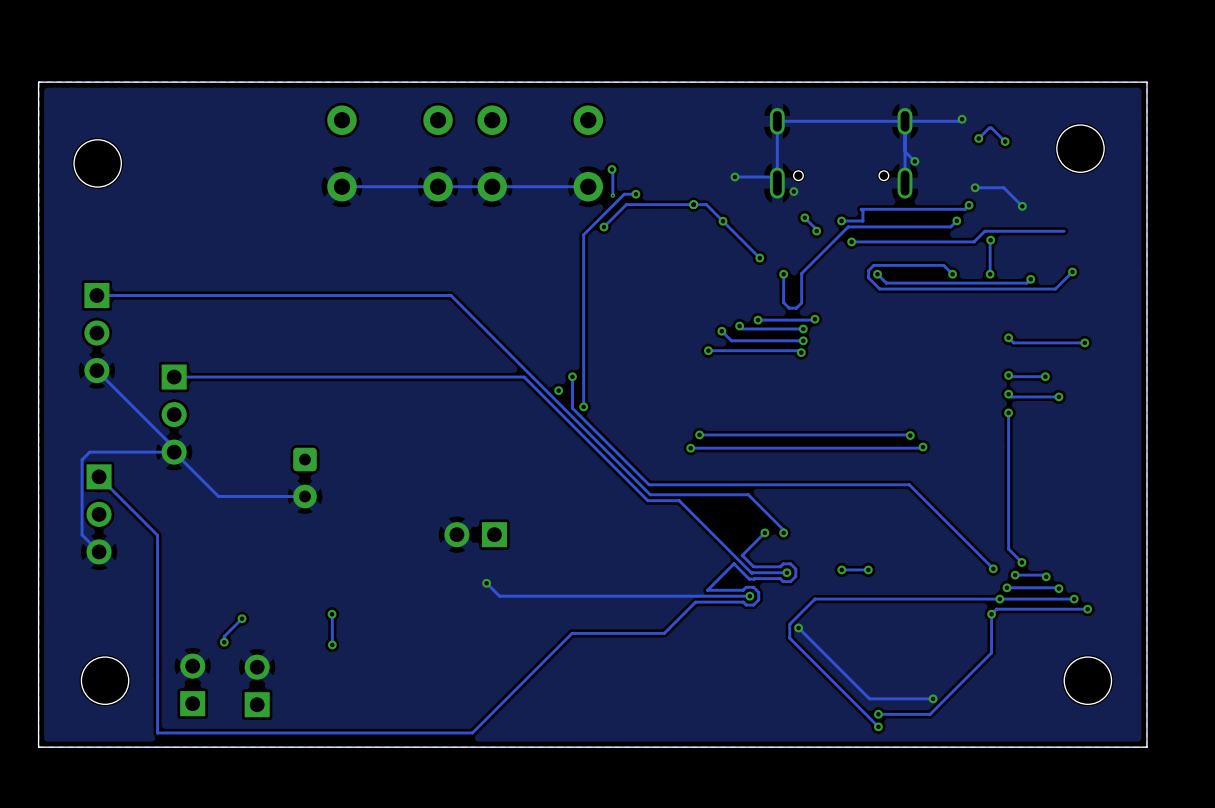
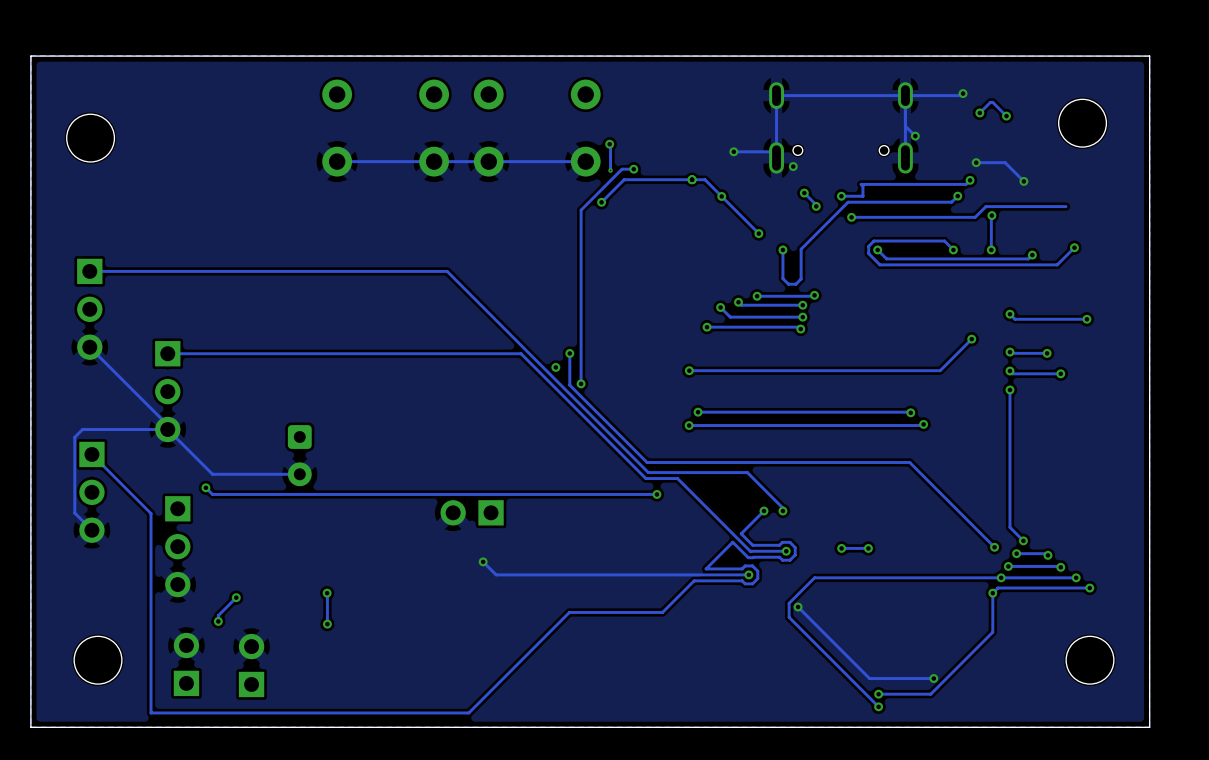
track: none -> (971, 339) (940, 370) (689, 370)
via: none -> (971, 339)
via: none -> (689, 370)
track: none -> (205, 487) (212, 494) (656, 494)
via: none -> (205, 487)
via: none -> (656, 494)
part: none -> (177, 546)

